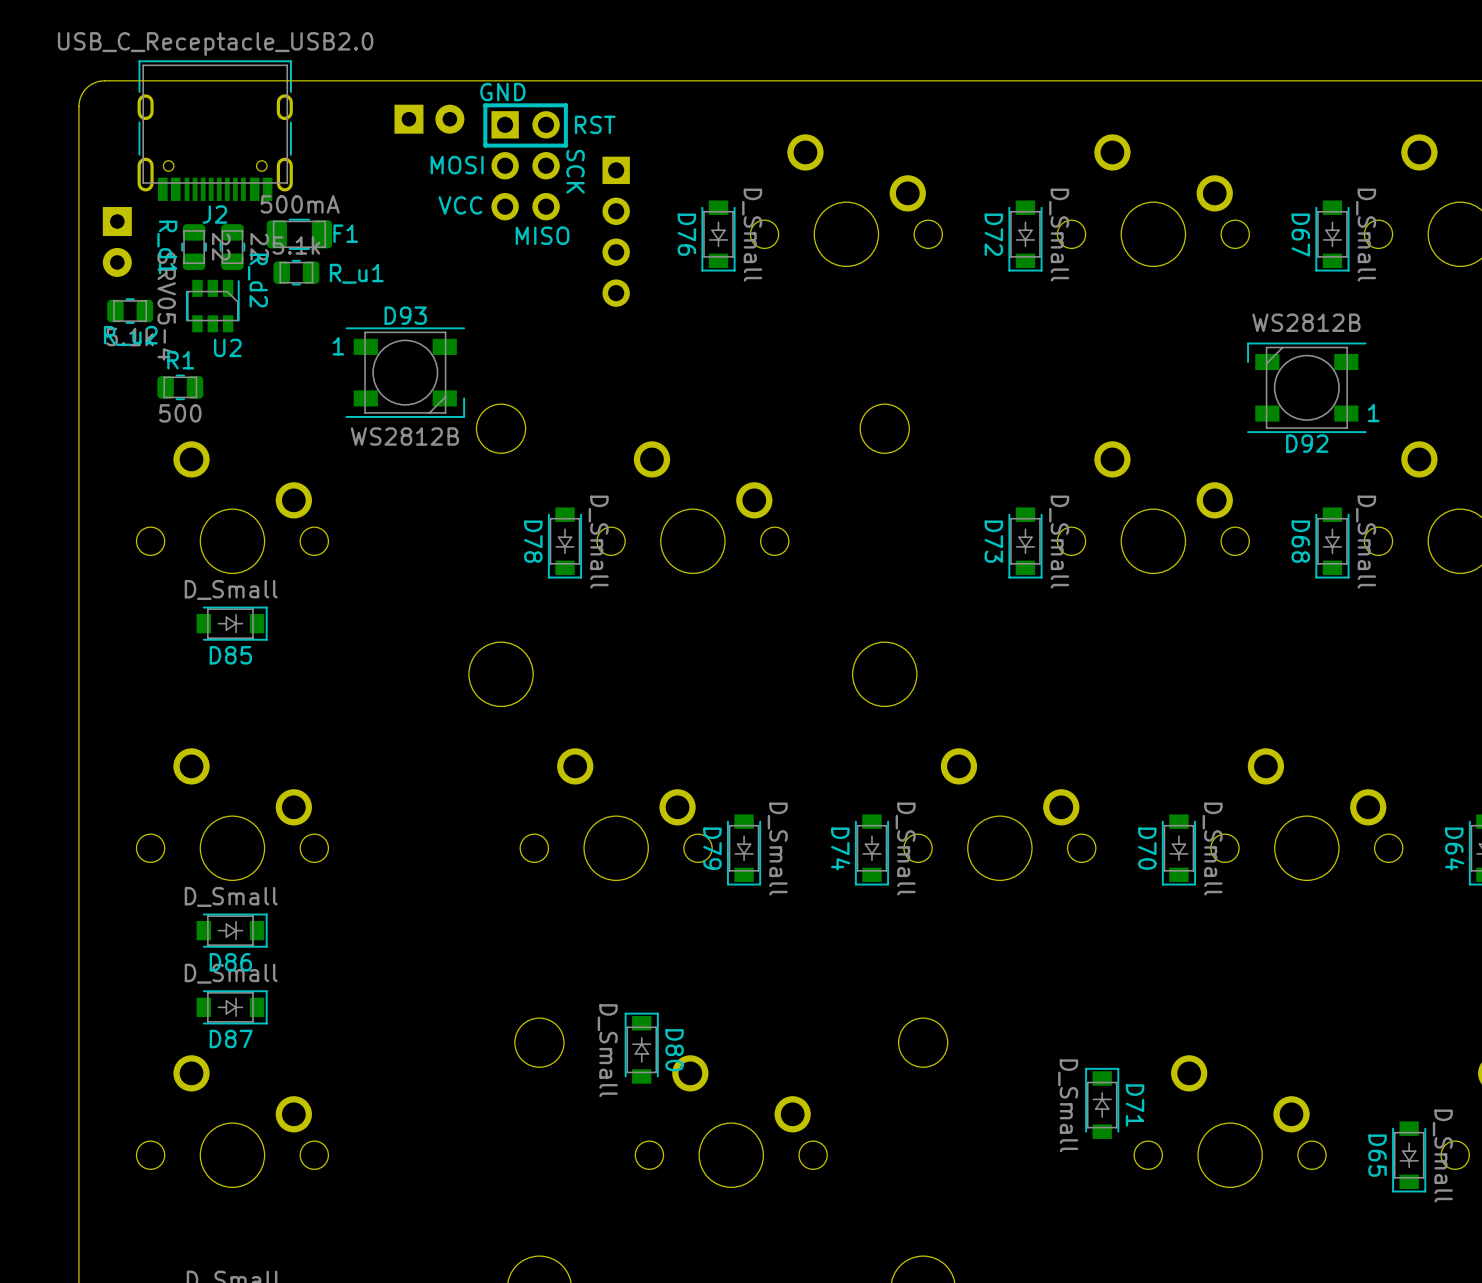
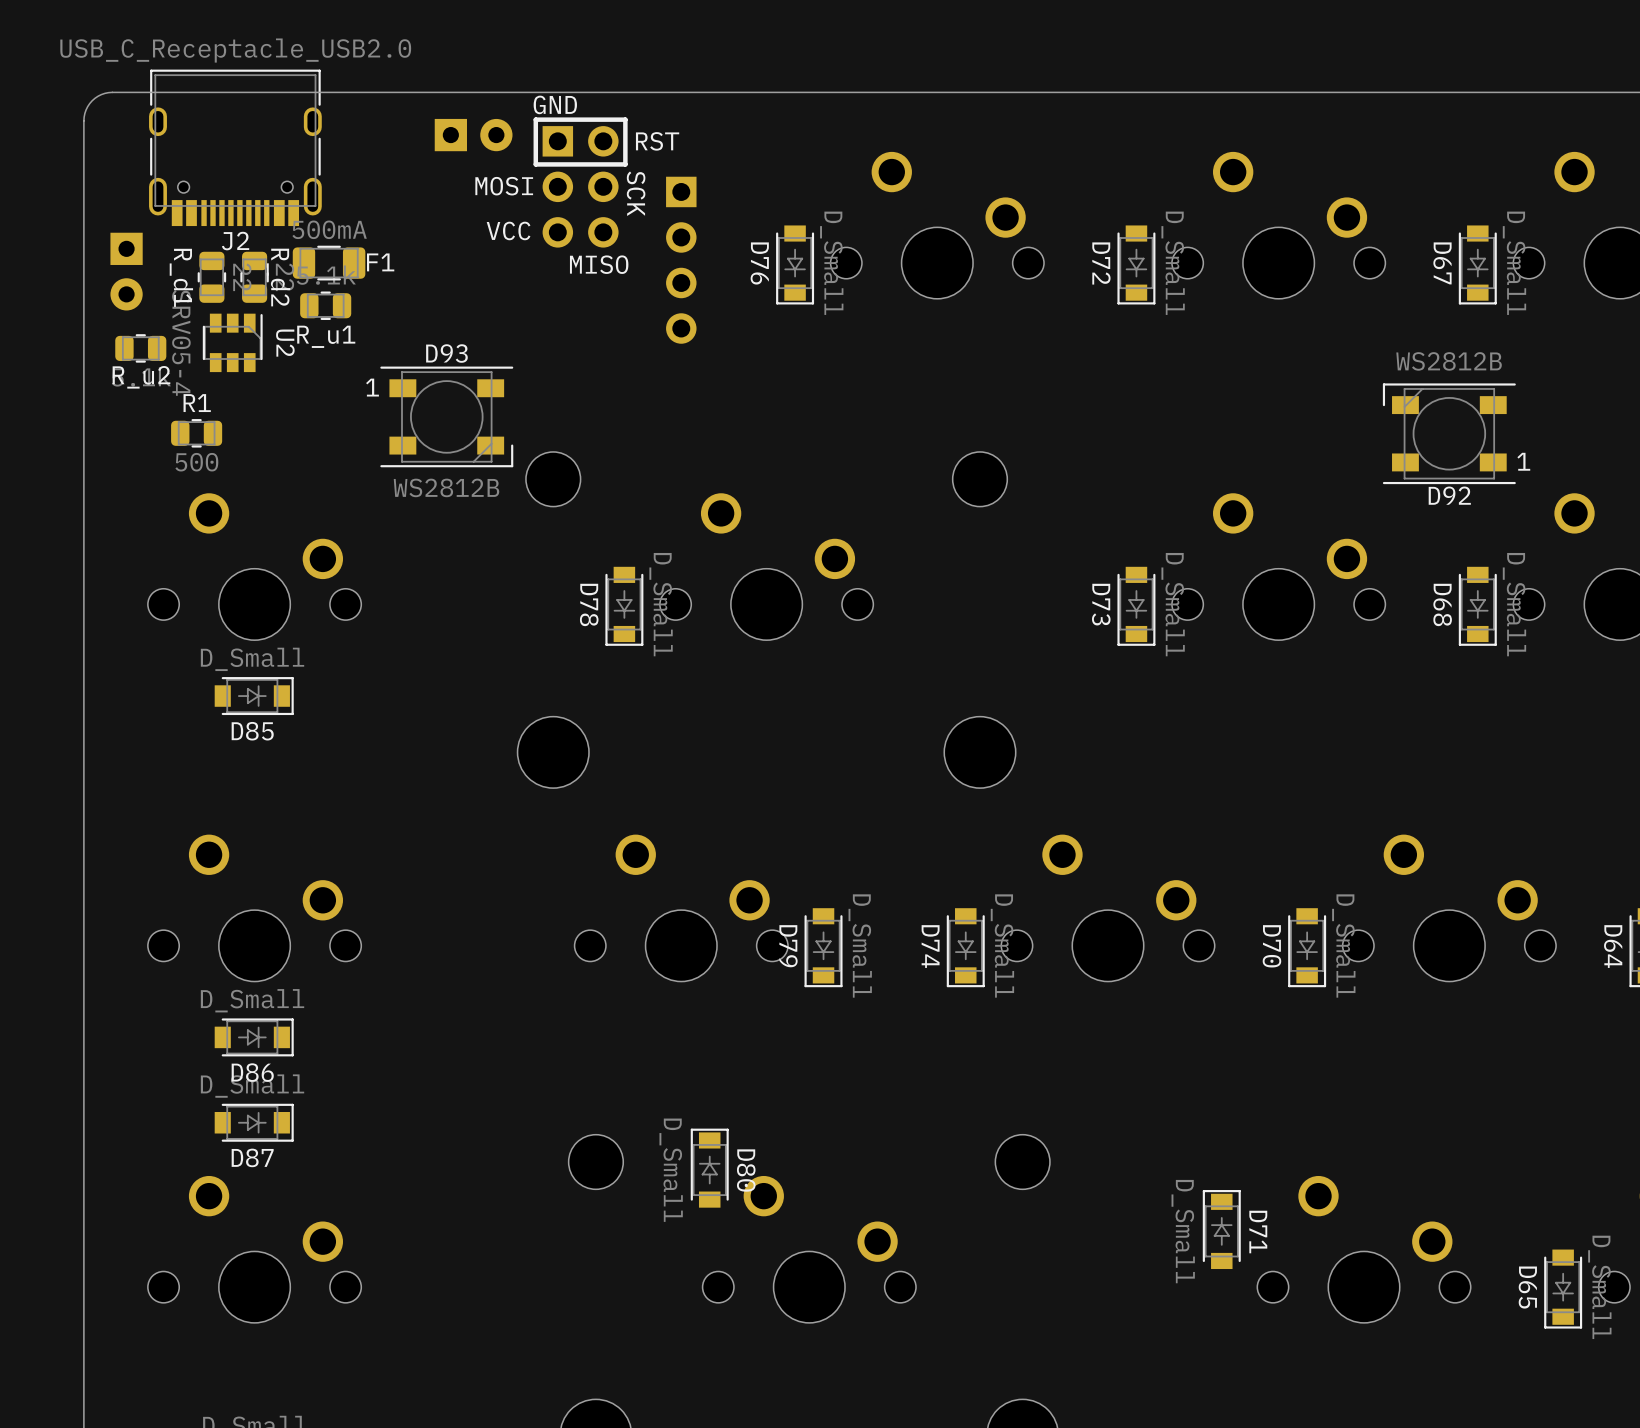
R_u1 name position: R_u1 (356, 273) -> R_u1 (326, 336)
R_d2 name position: R_d2 (257, 280) -> R_d2 (278, 277)
U2 name rotation: 0° (227, 347) -> 90° clockwise (285, 343)
U2 name position: U2 (227, 347) -> U2 (285, 343)

